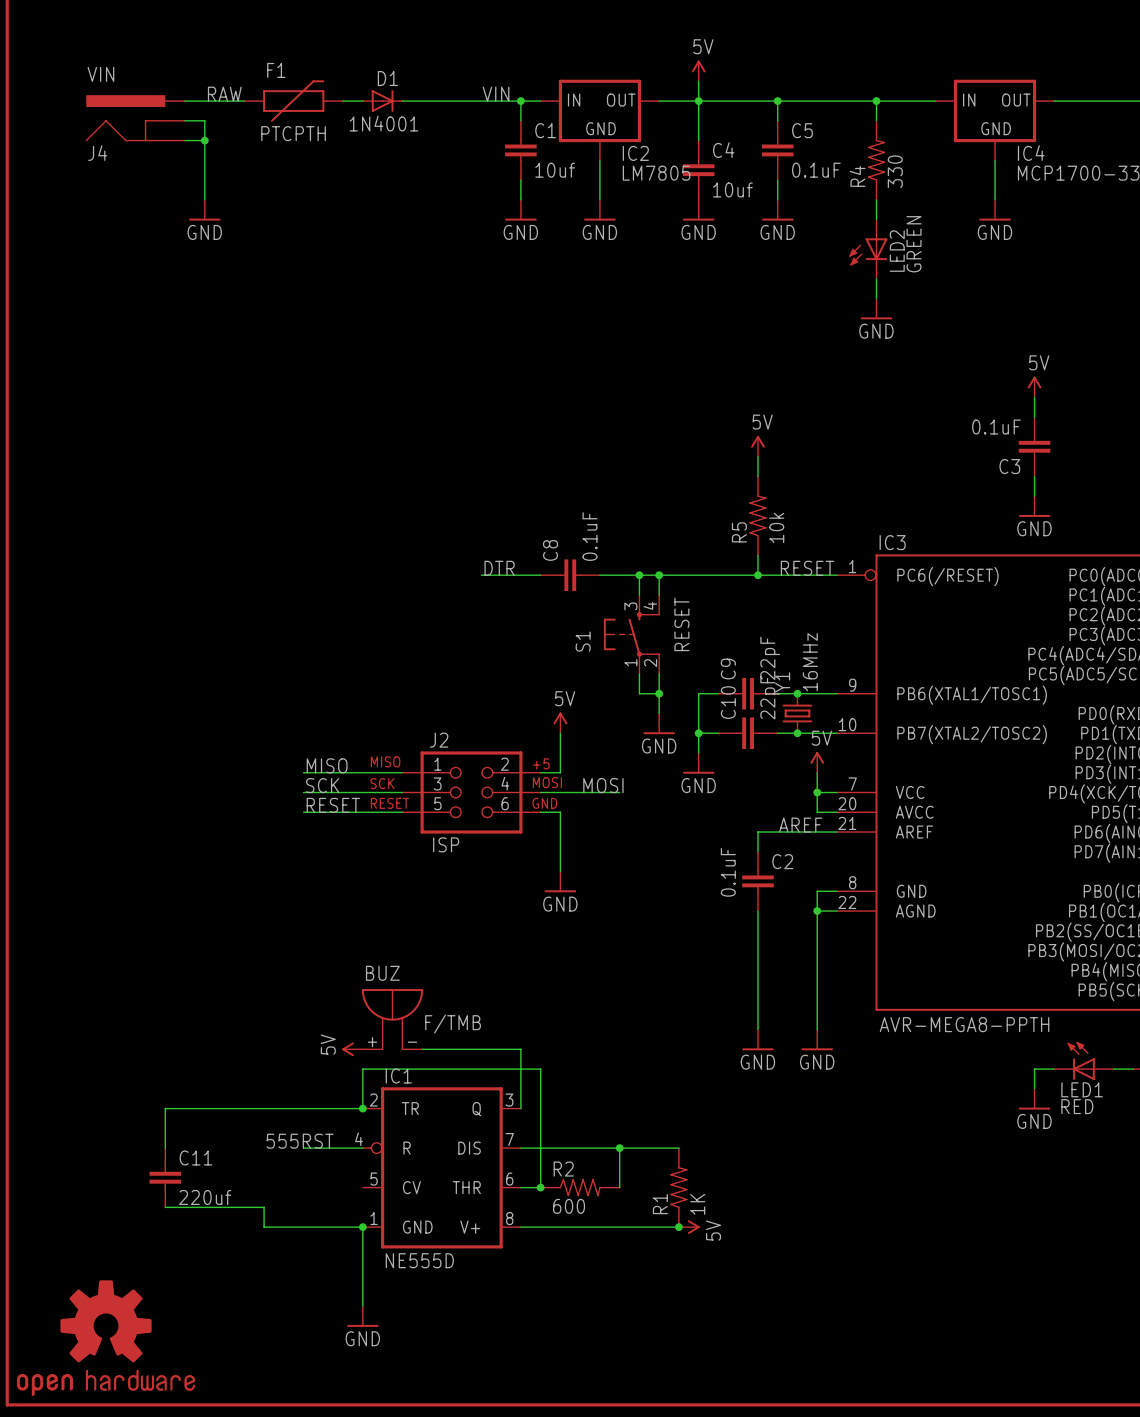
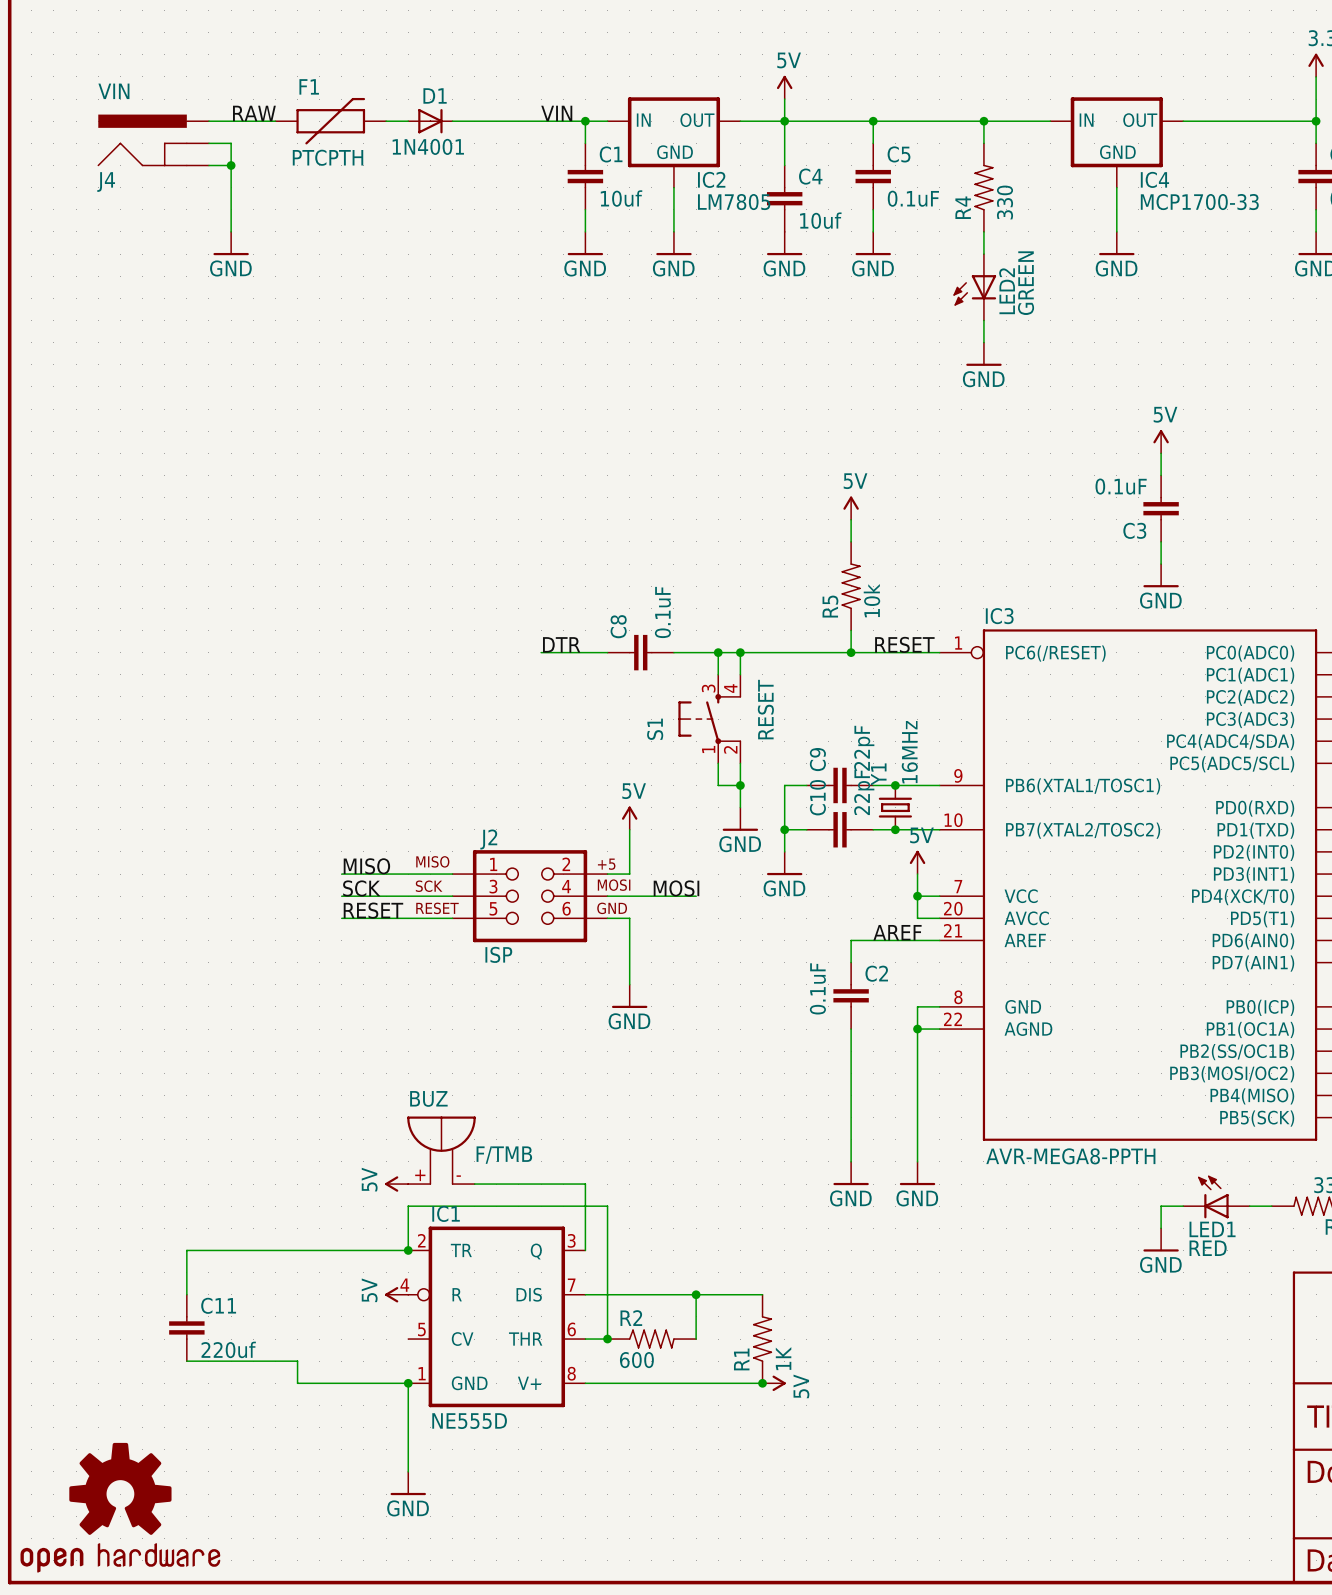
label: 555RST (300, 1141) -> none
wire: (303, 1148) (362, 1148) -> none
power symbol: none -> 5V (396, 1294)

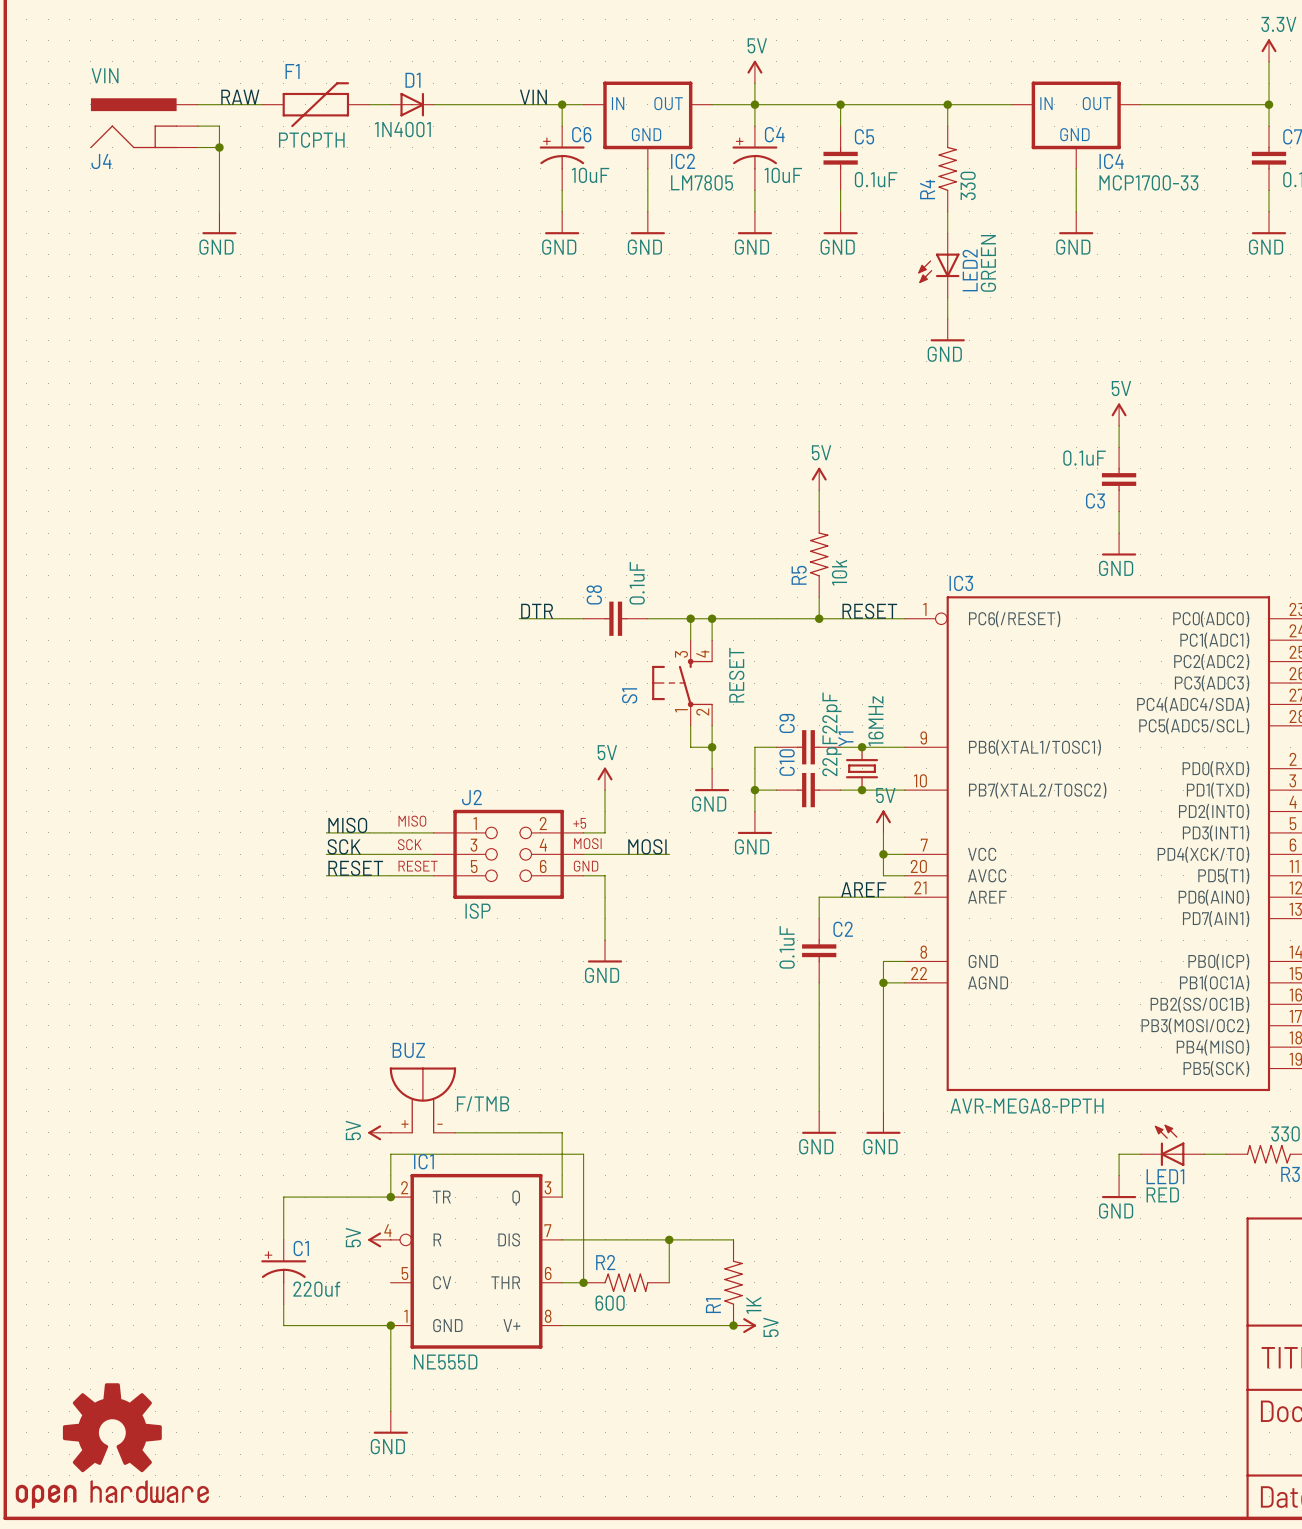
C1 symbol: [567, 143, 604, 210] -> [261, 1239, 307, 1305]
C4 symbol: [766, 165, 803, 232] -> [732, 126, 778, 191]
C6: none -> 10uF (562, 158)
C1 value: 10uf (621, 198) -> 220uf (316, 1289)
C4 value: 10uf (820, 220) -> 10uF (783, 175)
wire: (297, 1250) (186, 1250) (186, 1294) -> (283, 1197) (283, 1239)
C11: 220uf (186, 1327) -> none
wire: (186, 1361) (297, 1361) -> none

